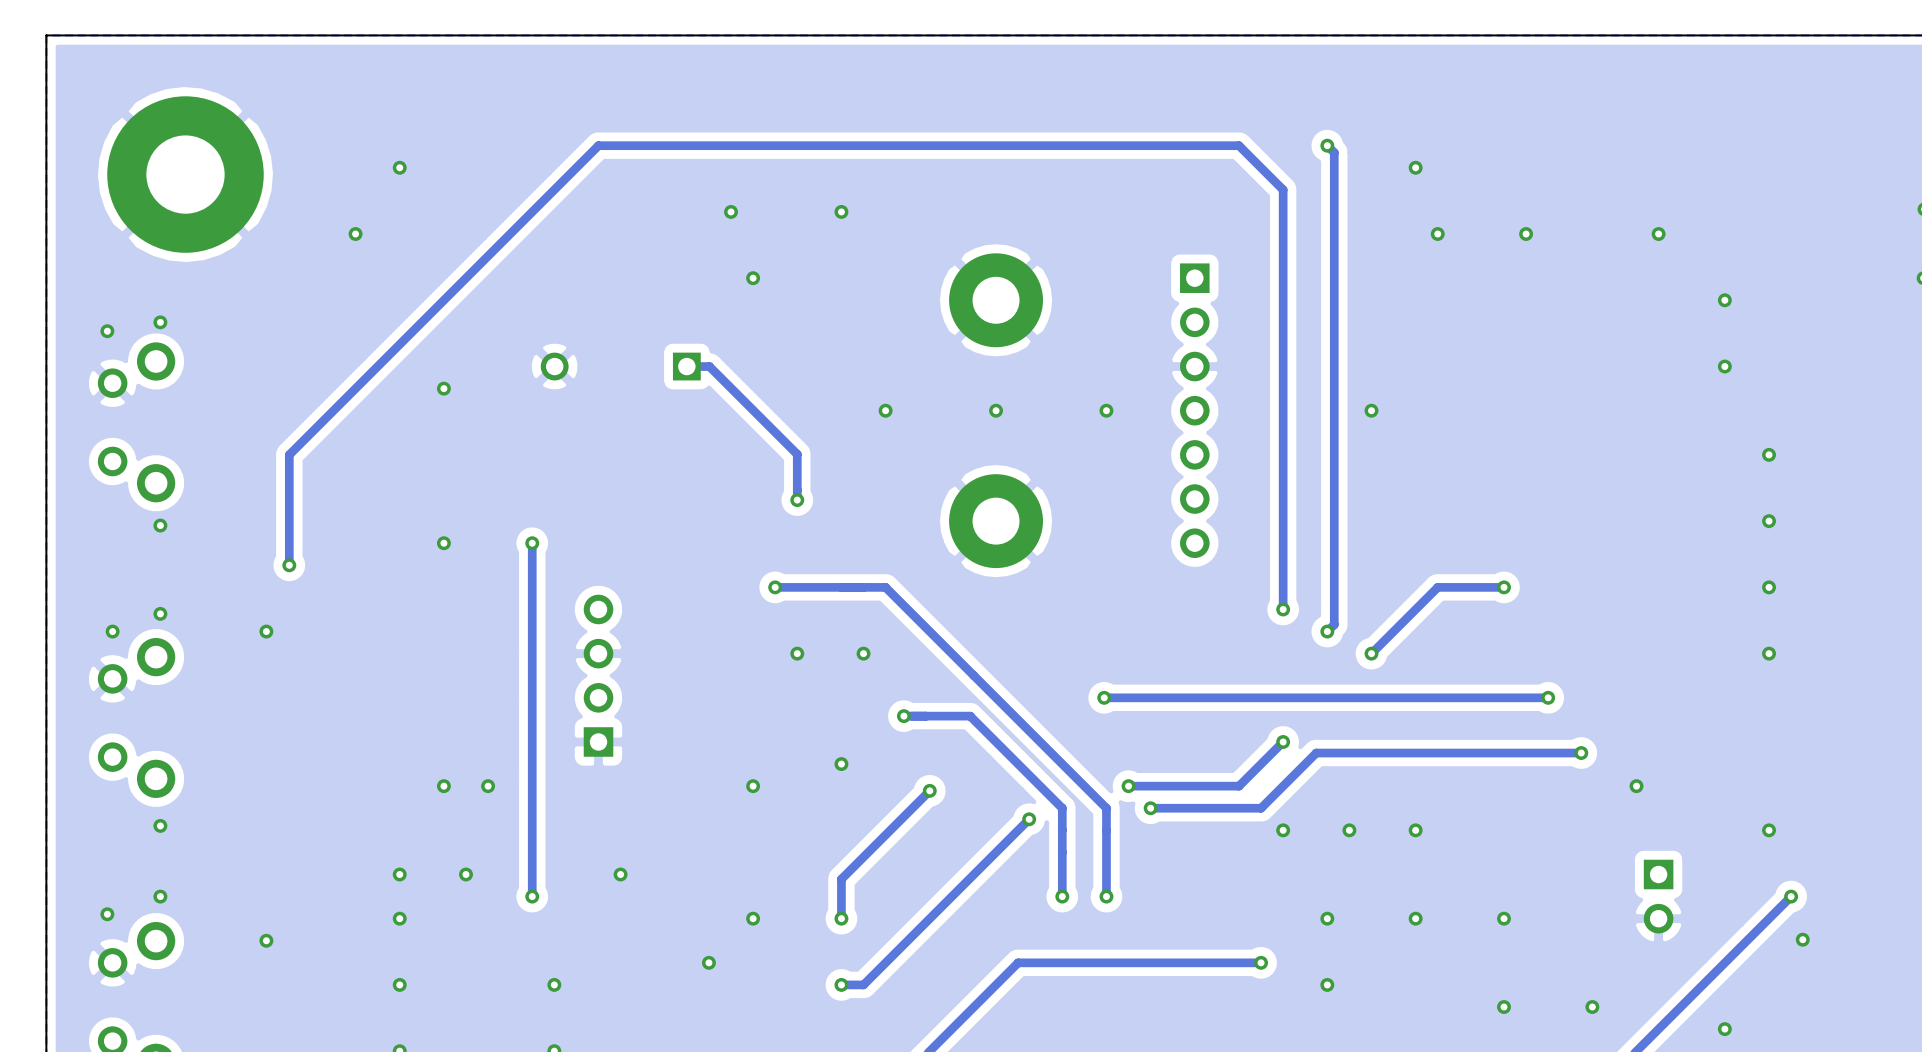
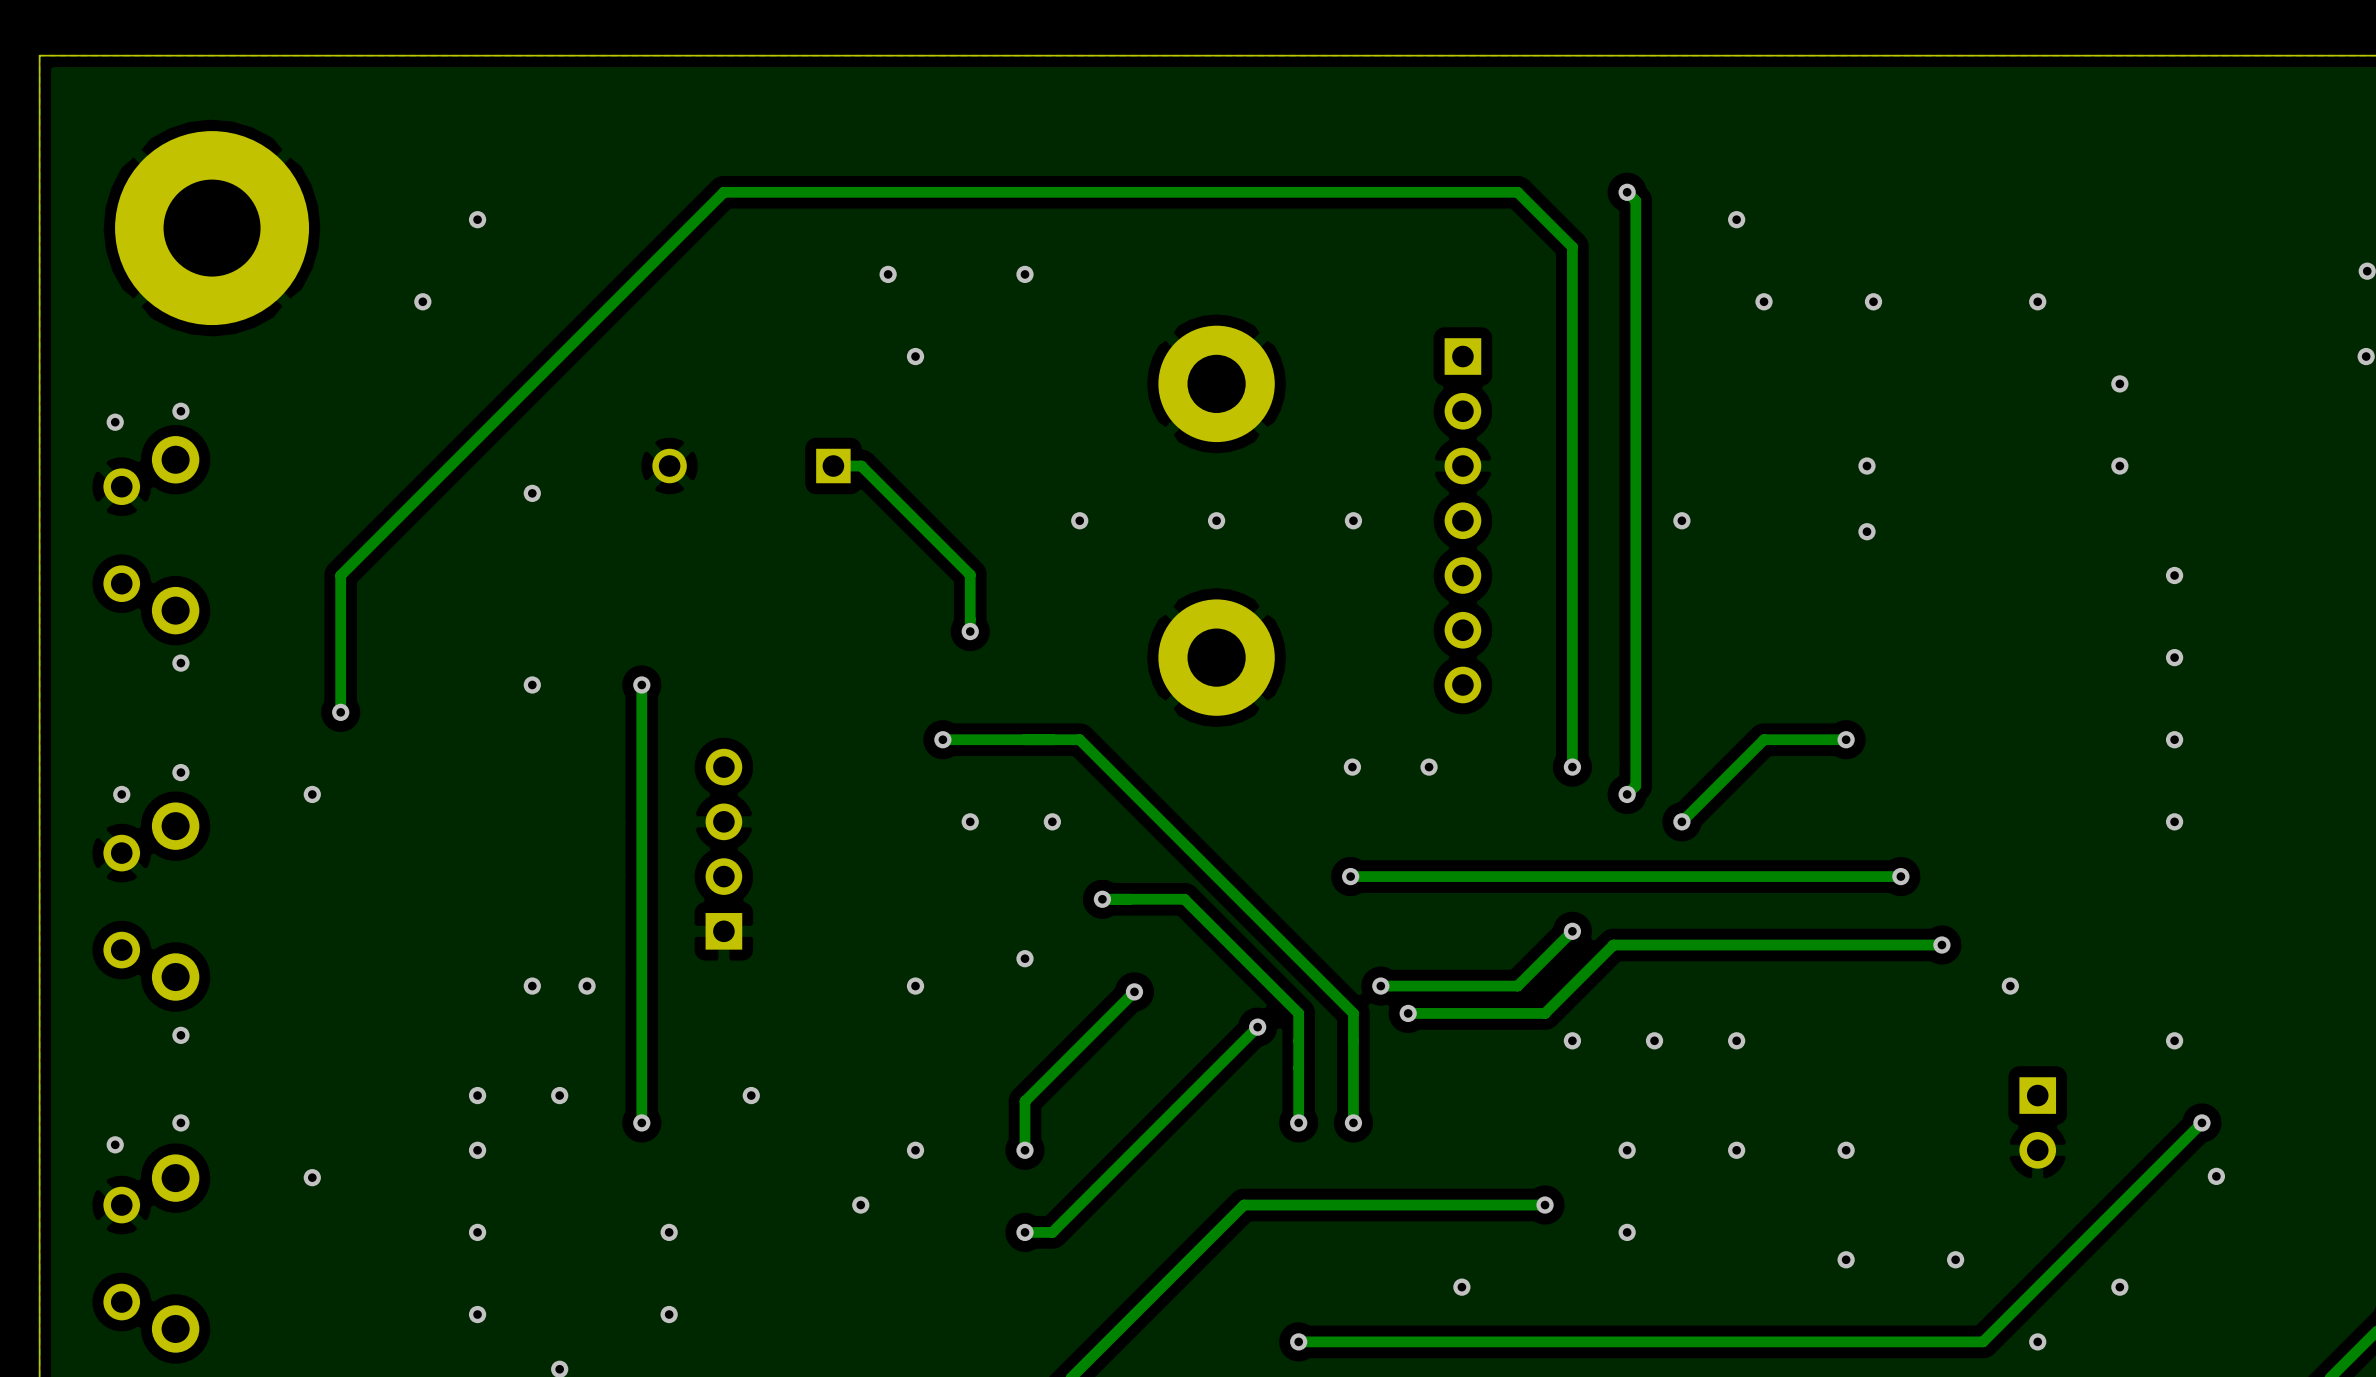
via: none -> (1866, 466)
via: none -> (1866, 531)
via: none -> (1352, 767)
via: none -> (1429, 767)
via: none -> (1461, 1287)

